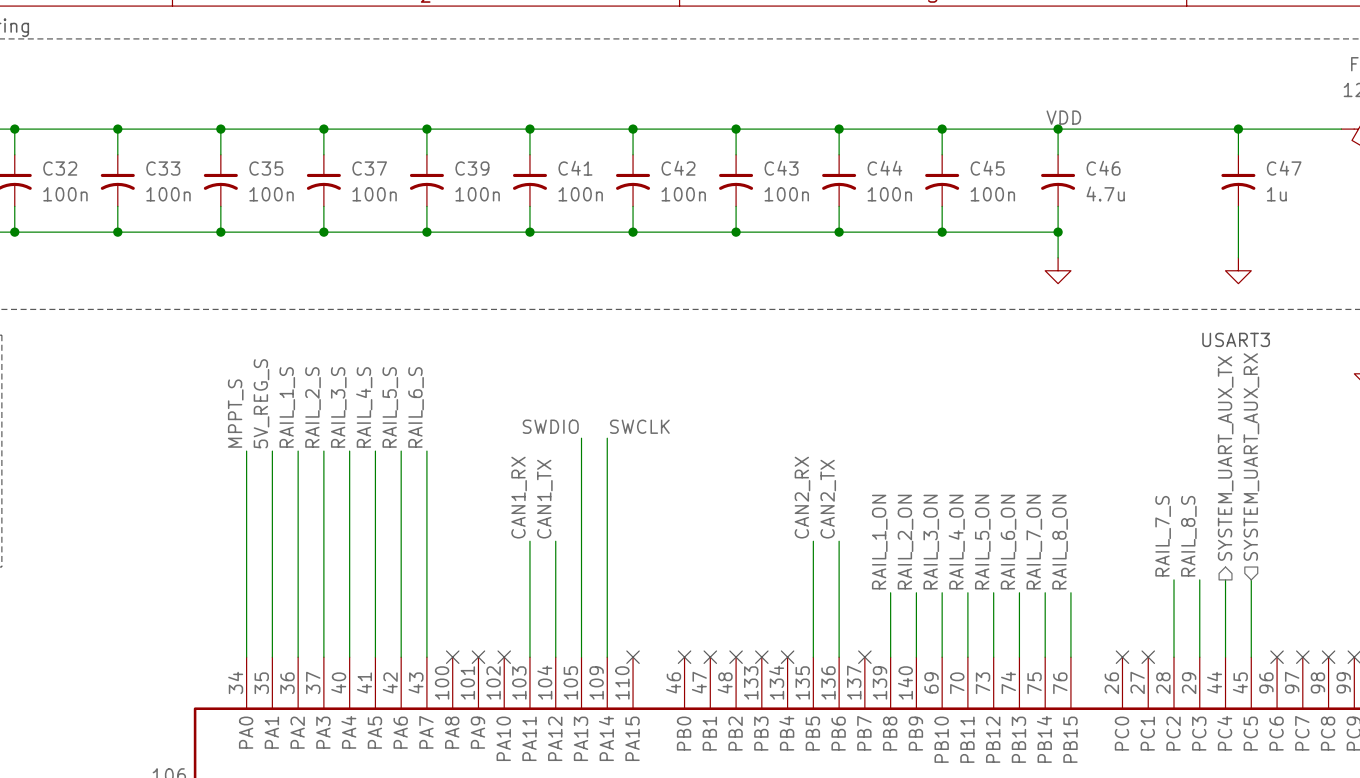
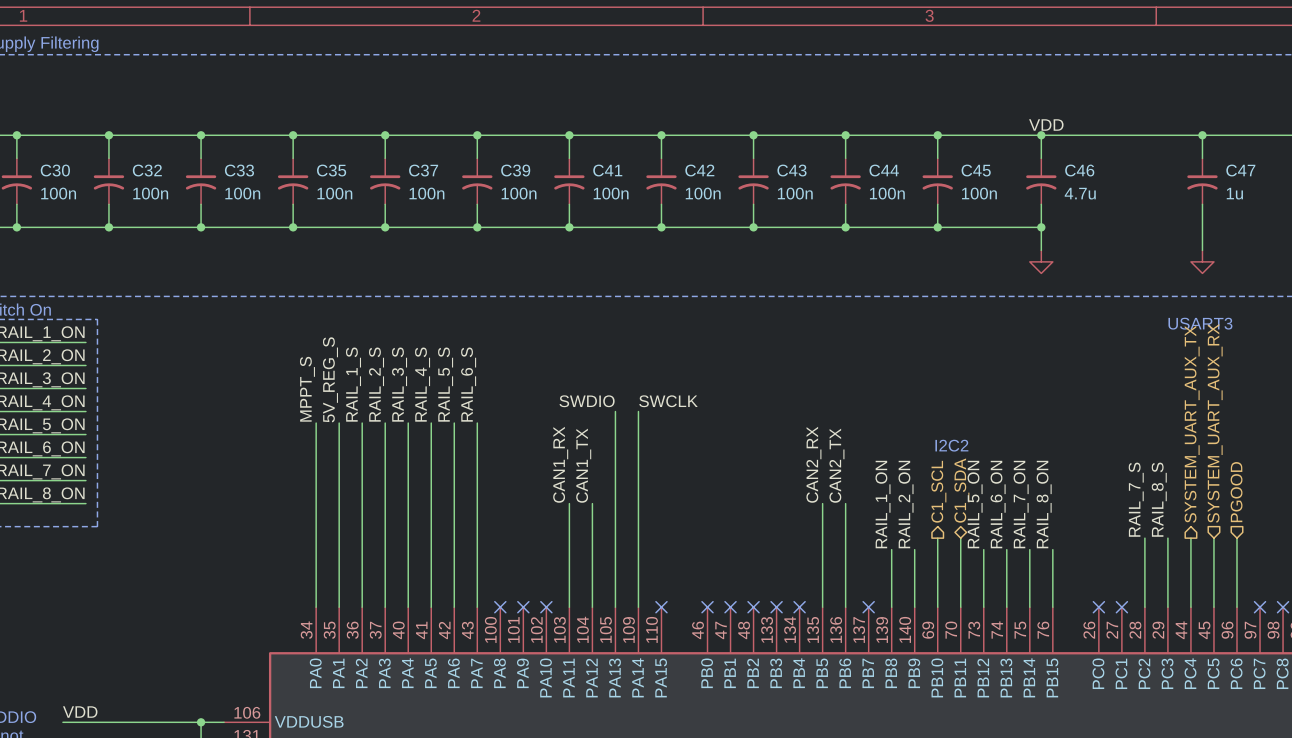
text: none -> I2C2 (951, 445)
hierarchical label: none -> C1_SCL (938, 491)
hierarchical label: none -> C1_SDA (961, 490)
hierarchical label: none -> PGOOD (1236, 492)
label: RAIL_3_ON (931, 542) -> none
label: RAIL_4_ON (956, 542) -> none
wire: none -> (937, 538) (937, 549)
wire: none -> (960, 538) (960, 549)
wire: none -> (1236, 538) (1236, 607)
no-connect mark: (1277, 657) -> none

